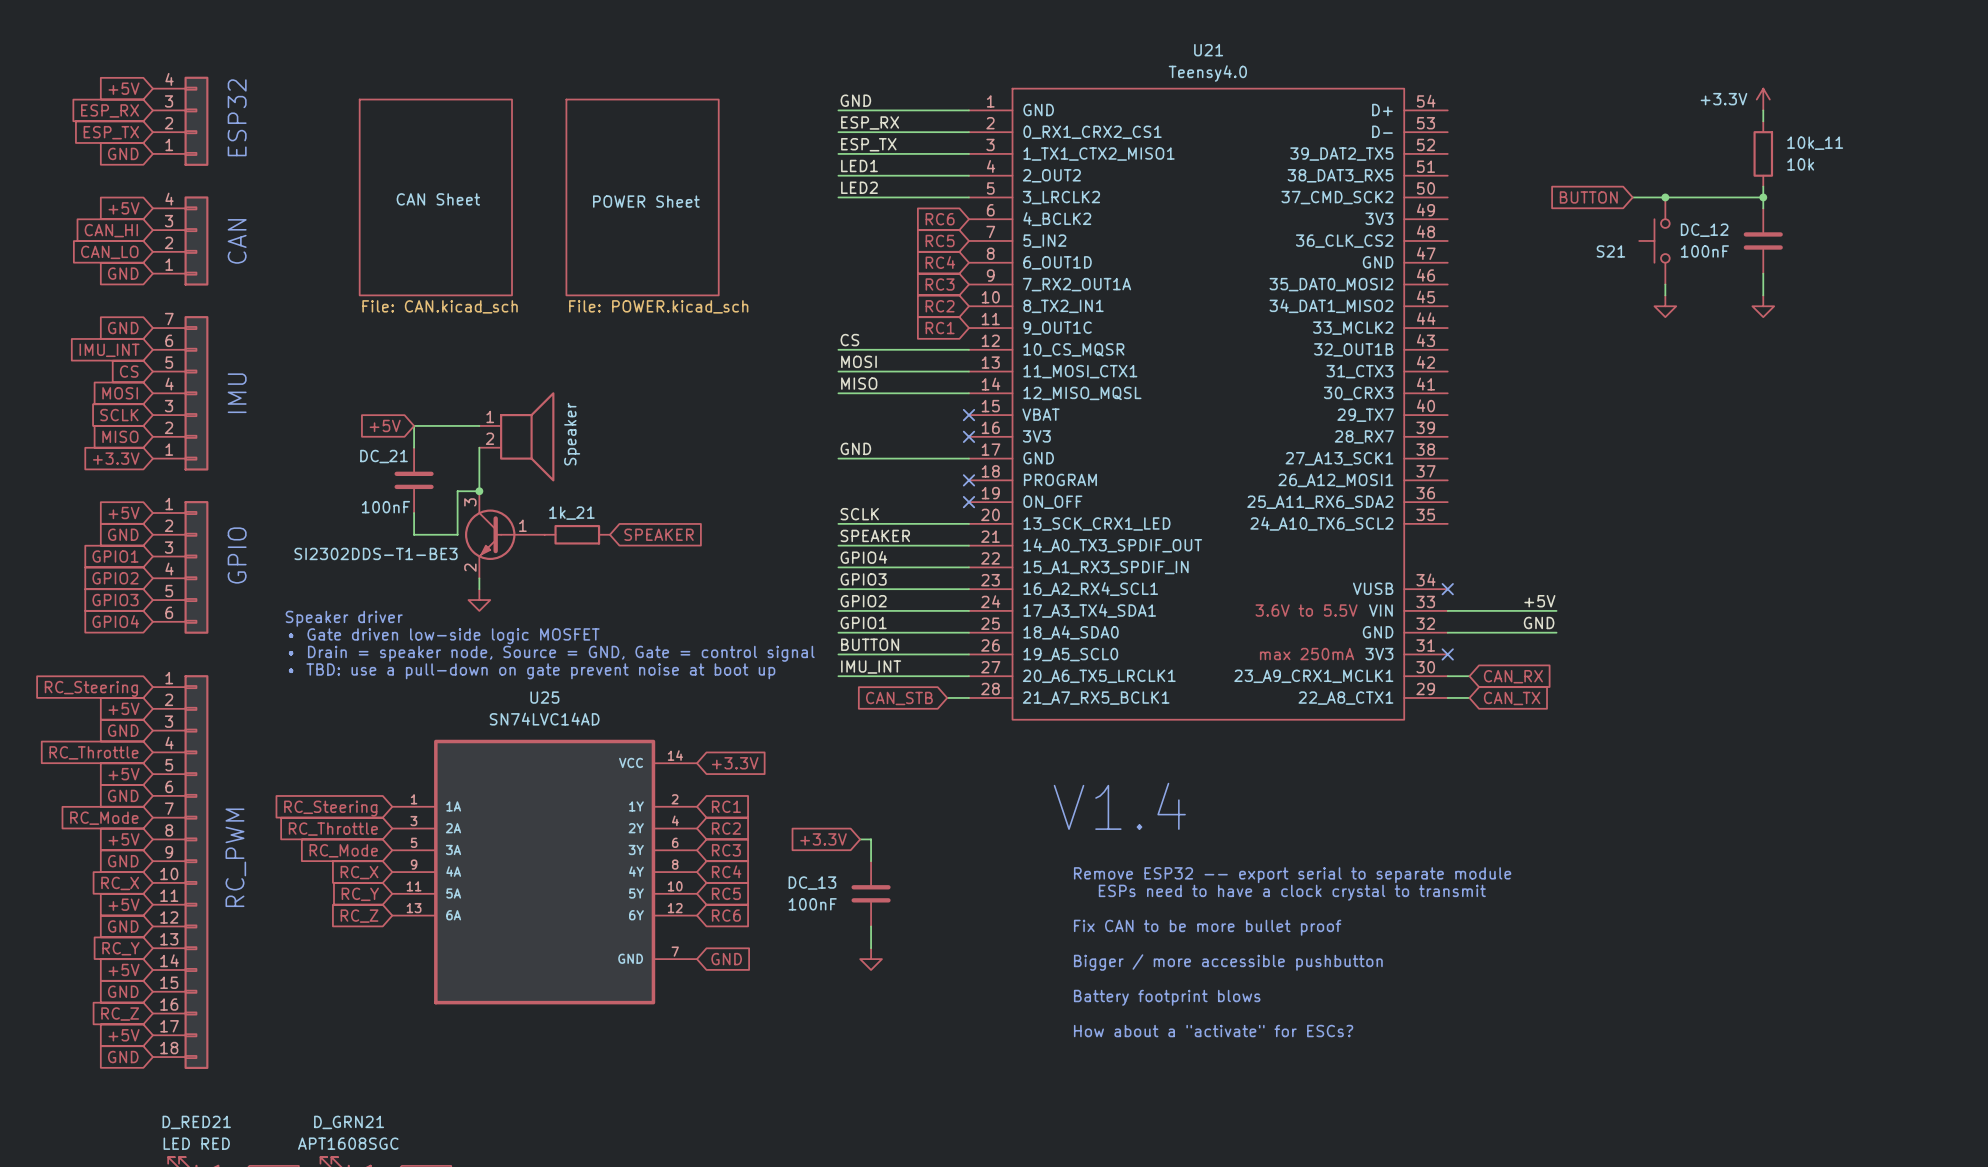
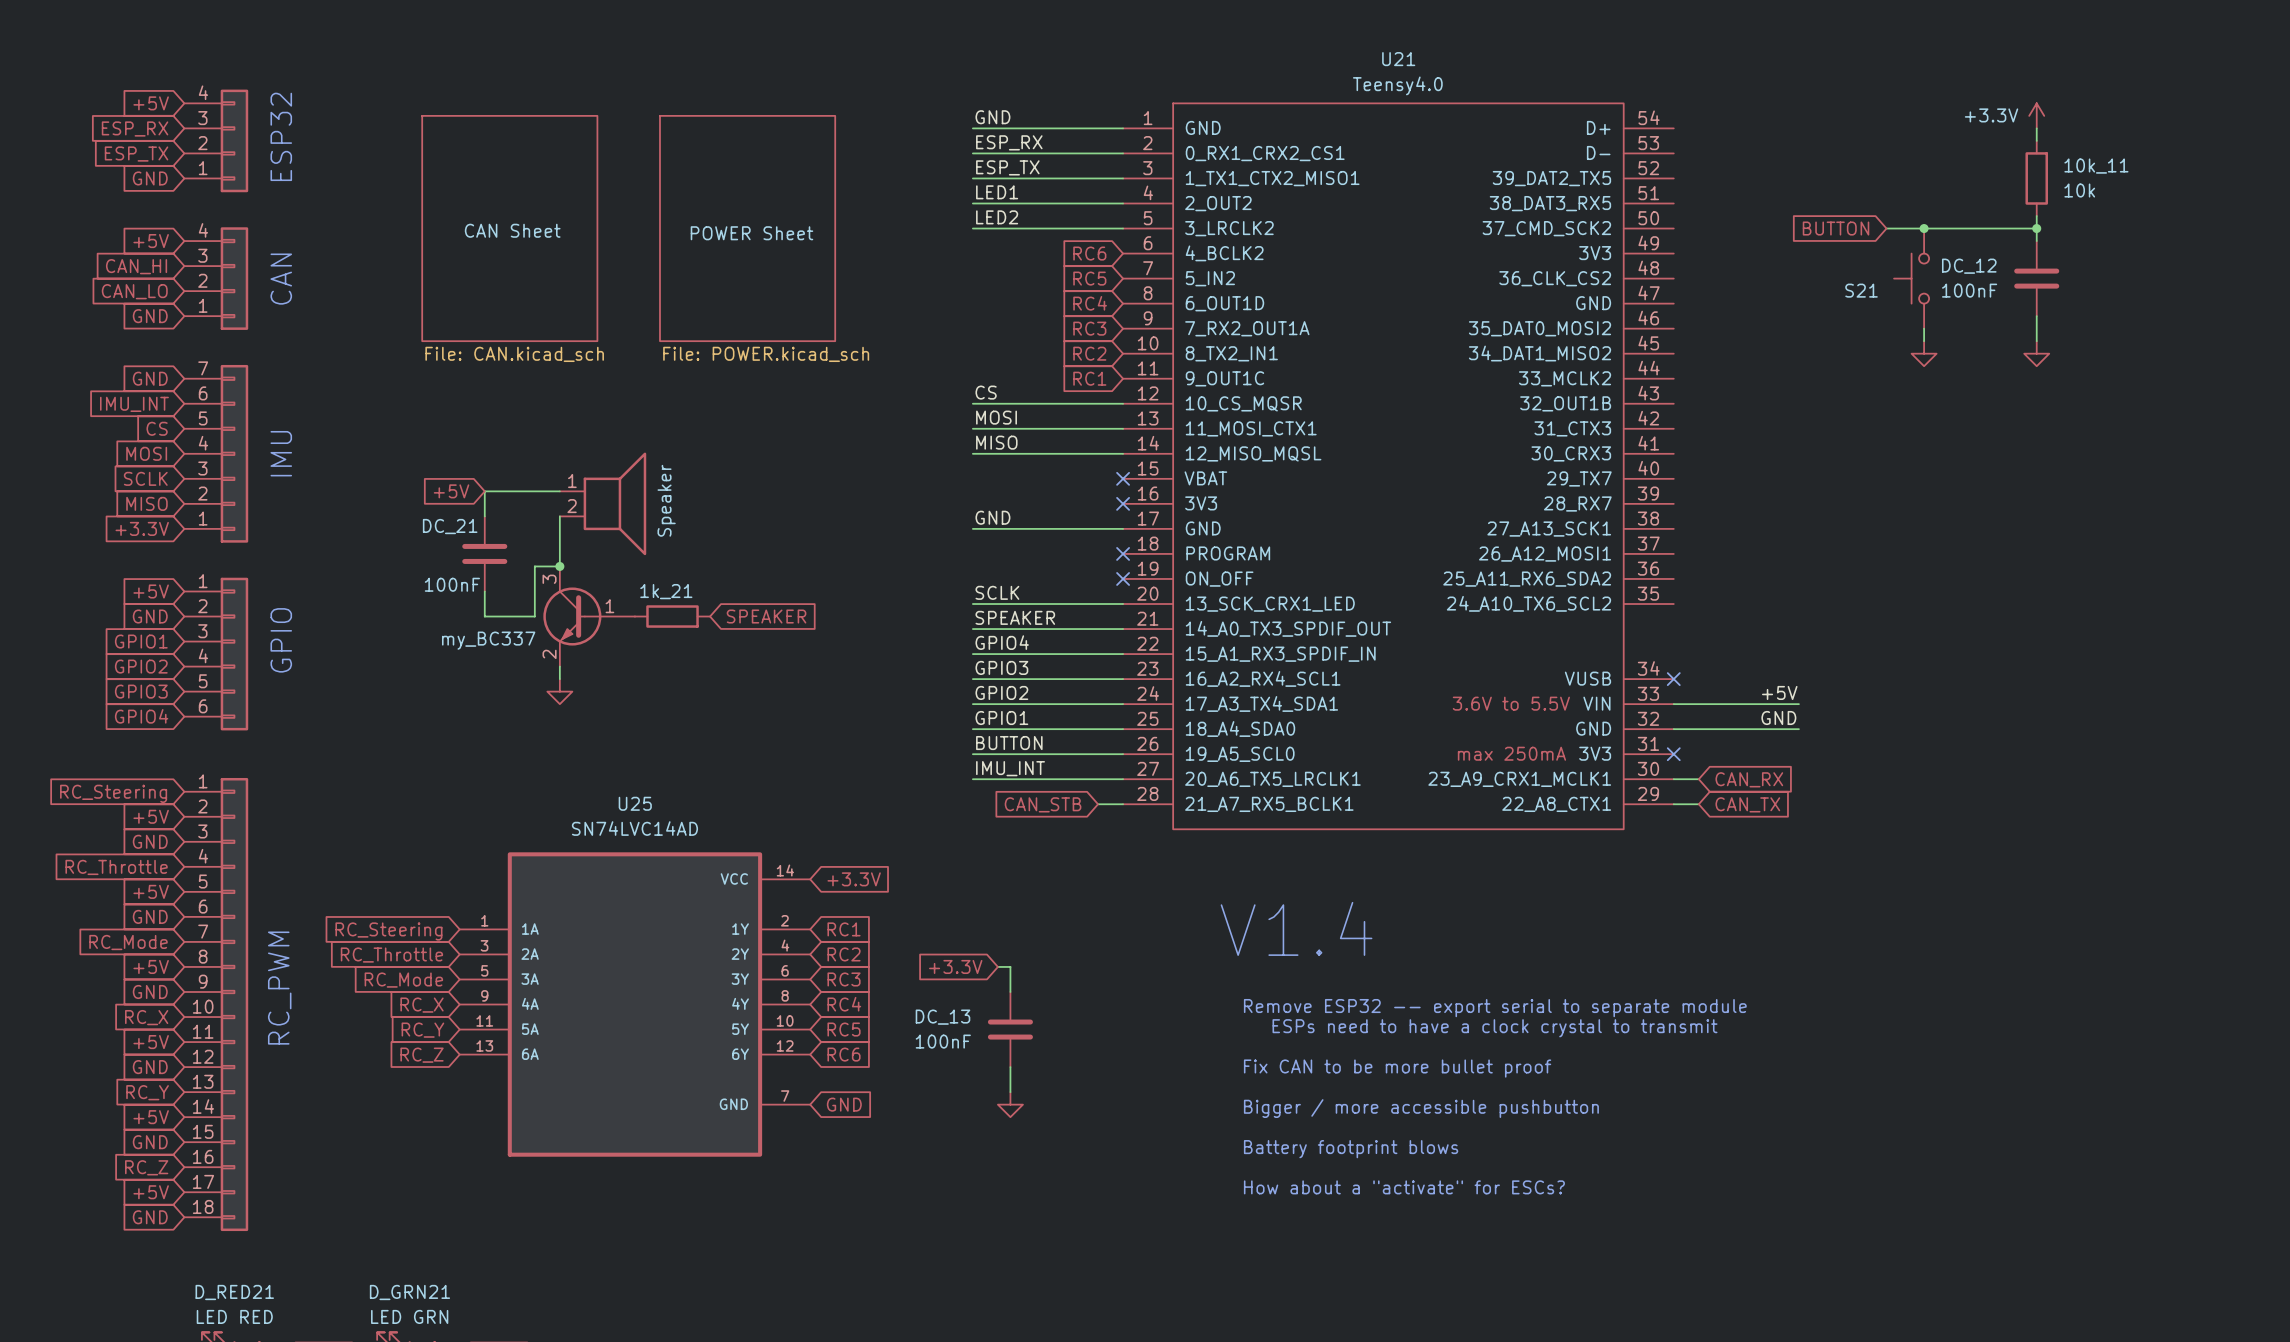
part value: SI2302DDS-T1-BE3 (376, 553) -> my_BC337 (488, 640)
text: Speaker driver (344, 618) -> none
text: • Gate driven low-side logic MOSFET (444, 636) -> none
text: • Drain = speaker node, Source = GND, Gate = control signal (551, 653) -> none
text: • TBD: use a pull-down on gate prevent noise at boot up (532, 671) -> none
D_GRN21 value: APT1608SGC (348, 1143) -> LED GRN (409, 1316)

